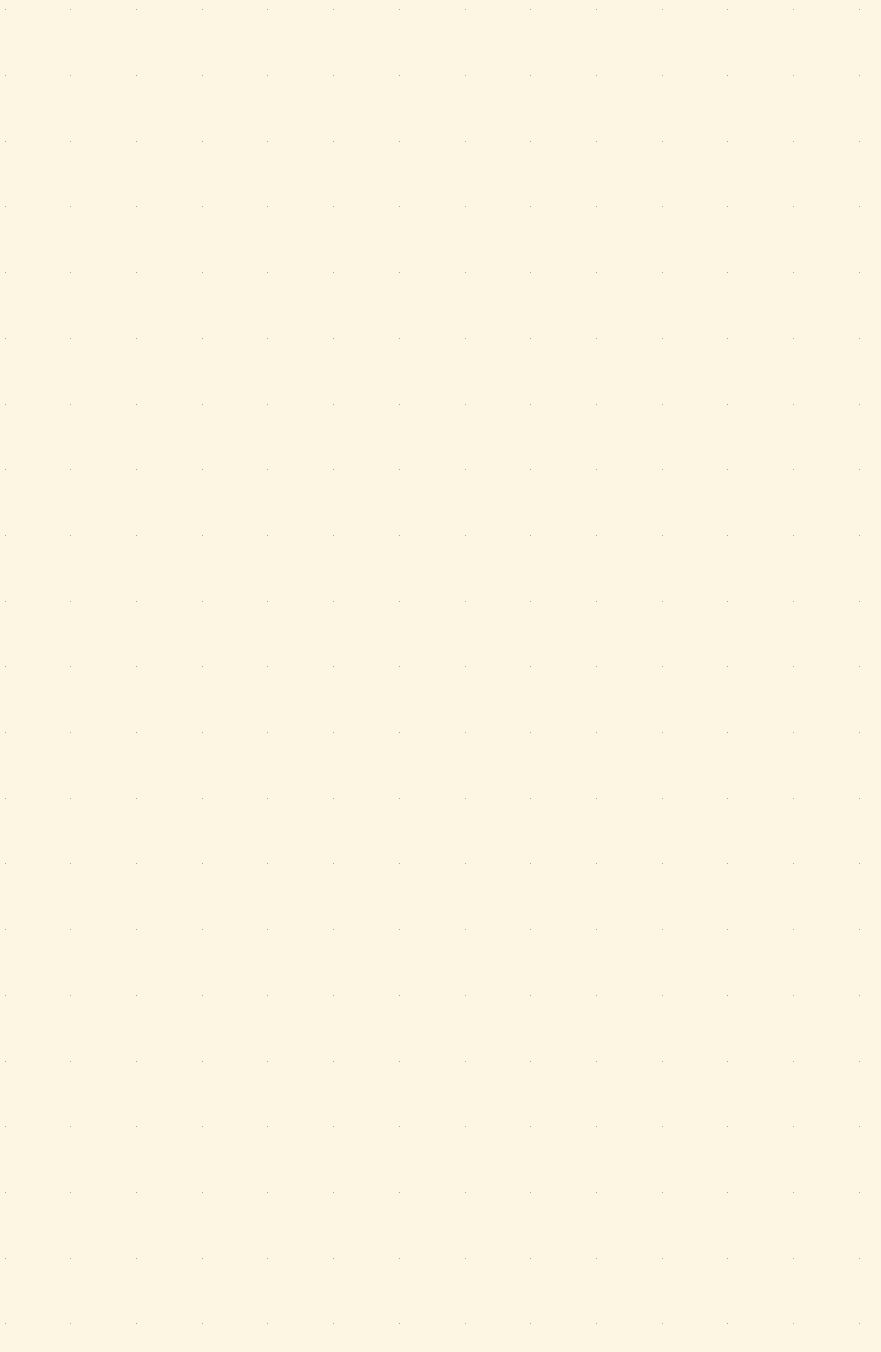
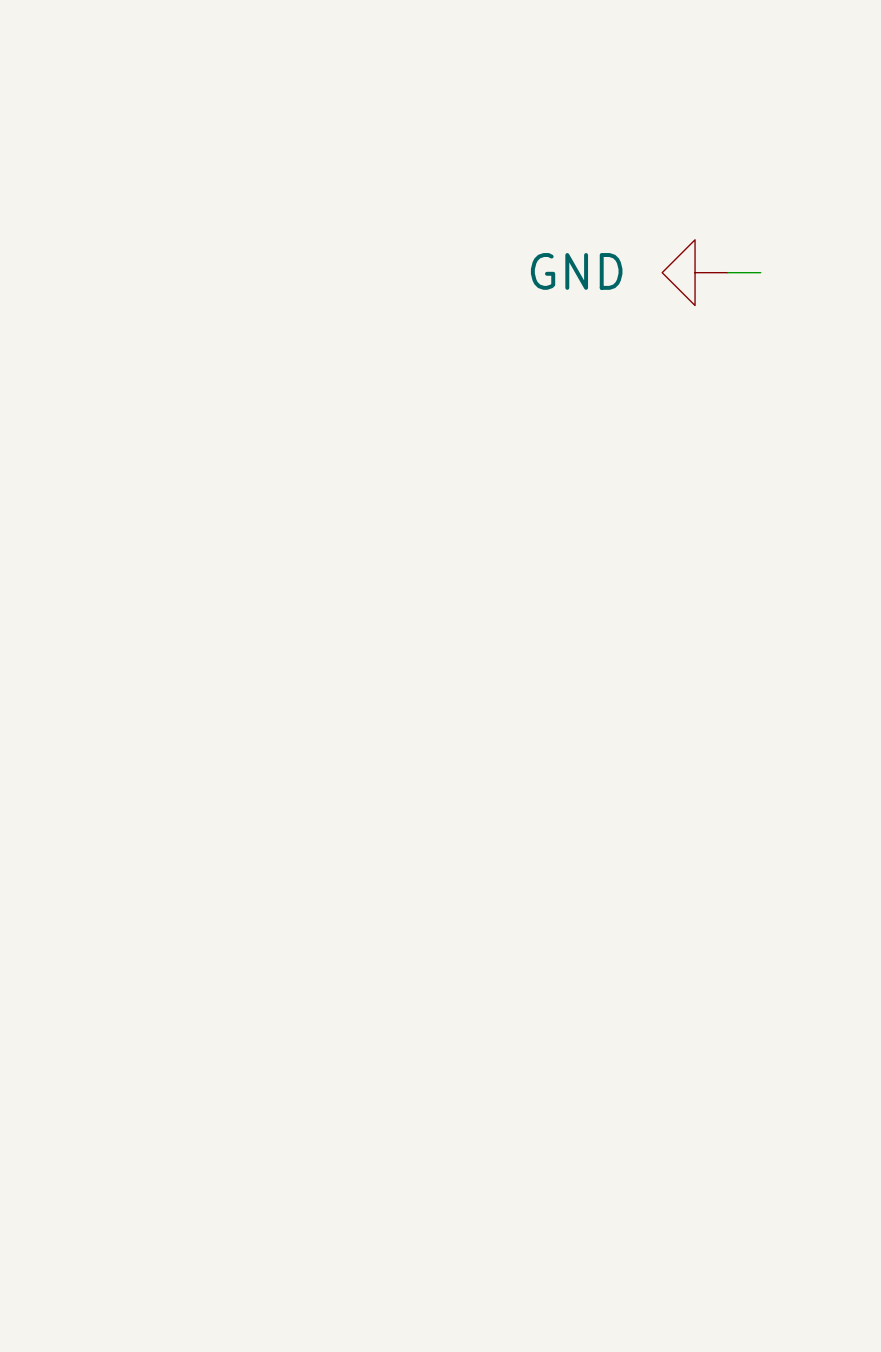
power symbol: none -> GND (695, 272)
wire: none -> (727, 272) (760, 272)

